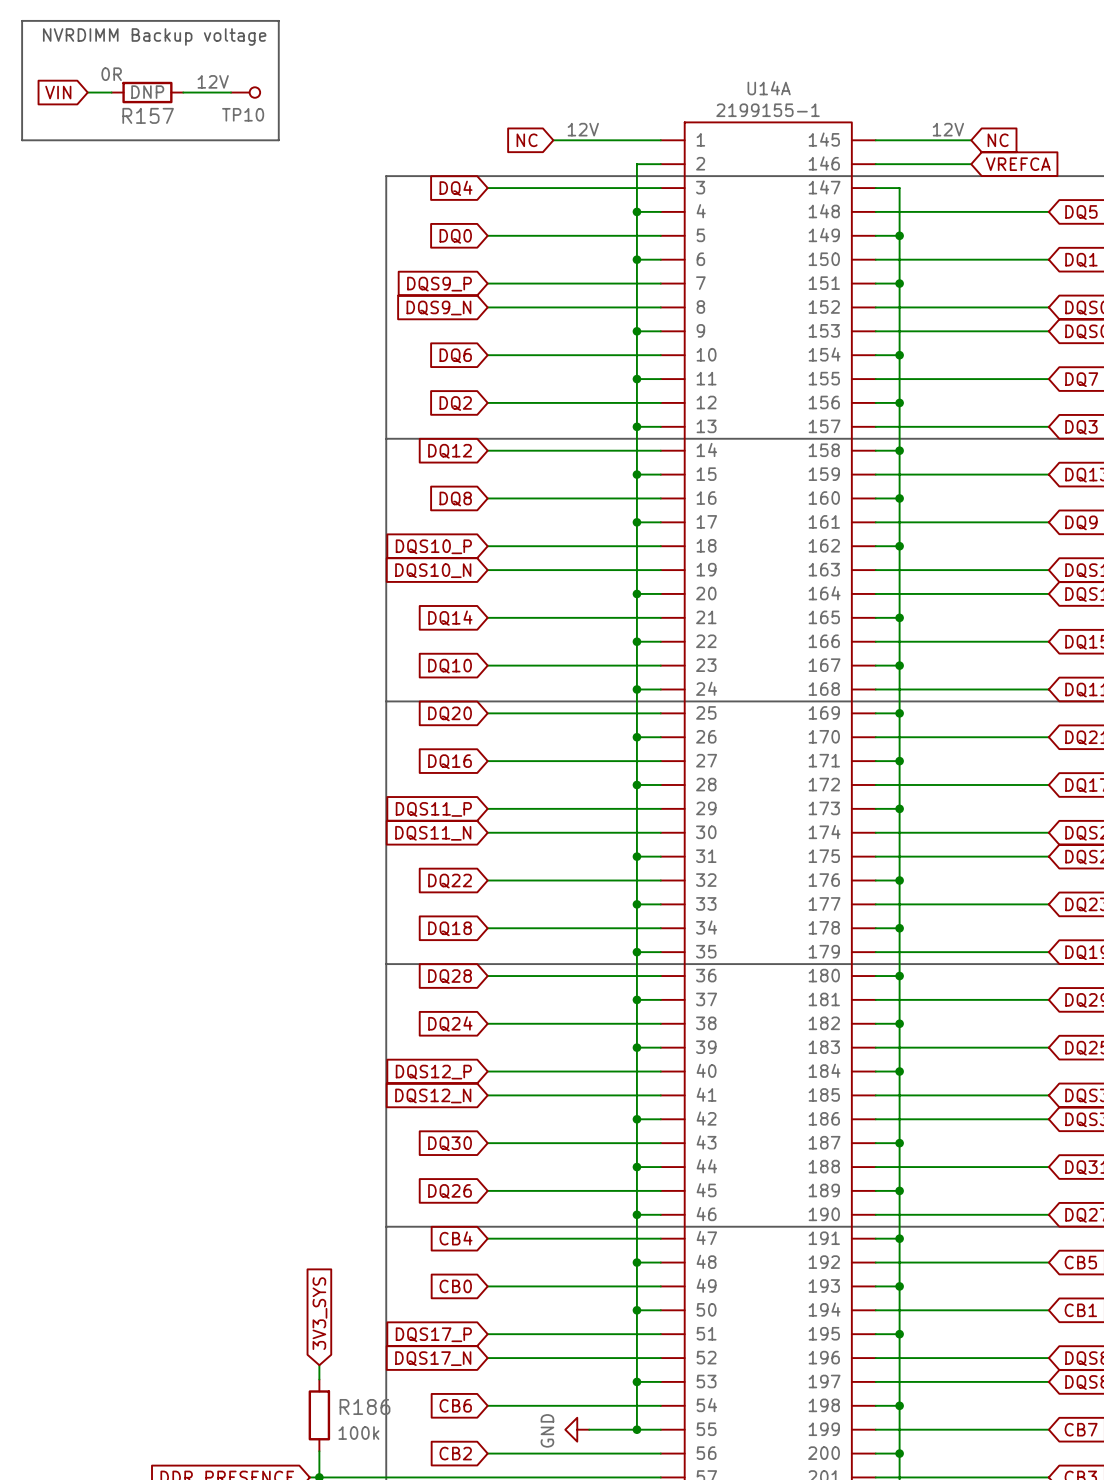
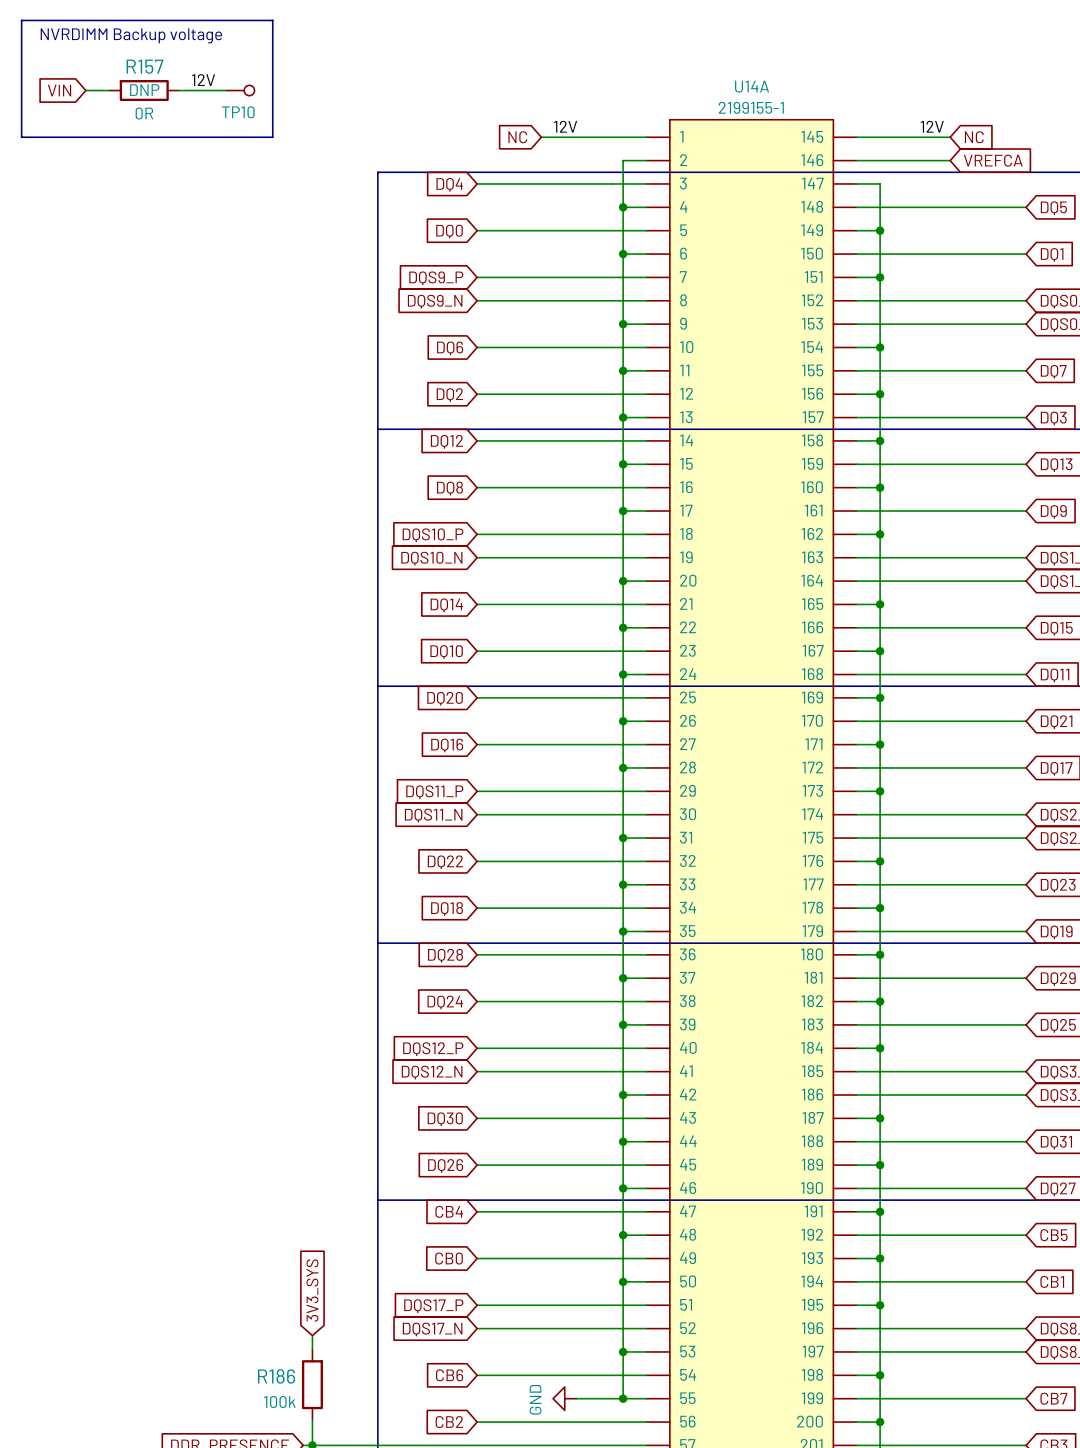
R157 text position: 0R (111, 74) -> 0R (144, 113)
R157 name position: R157 (148, 115) -> R157 (144, 66)
R186 name position: R186 (365, 1406) -> R186 (276, 1376)
R186 text position: 100k (358, 1433) -> 100k (279, 1402)

